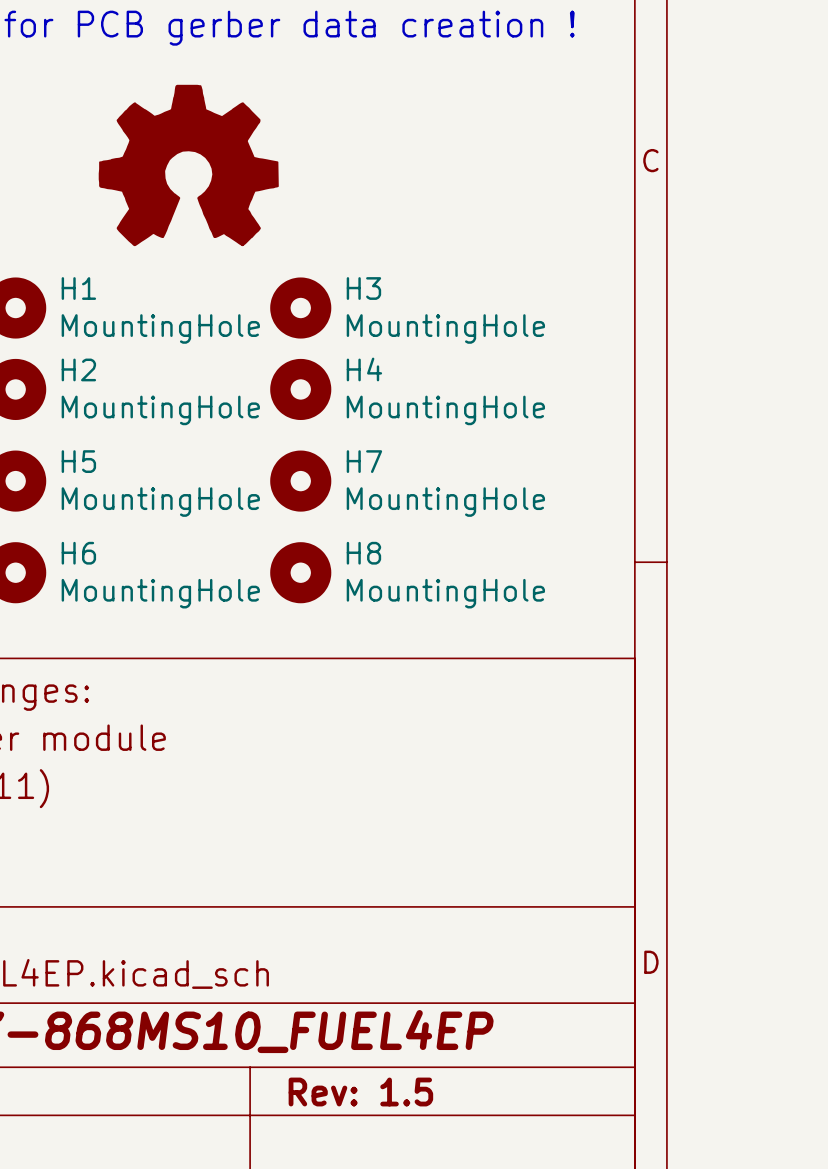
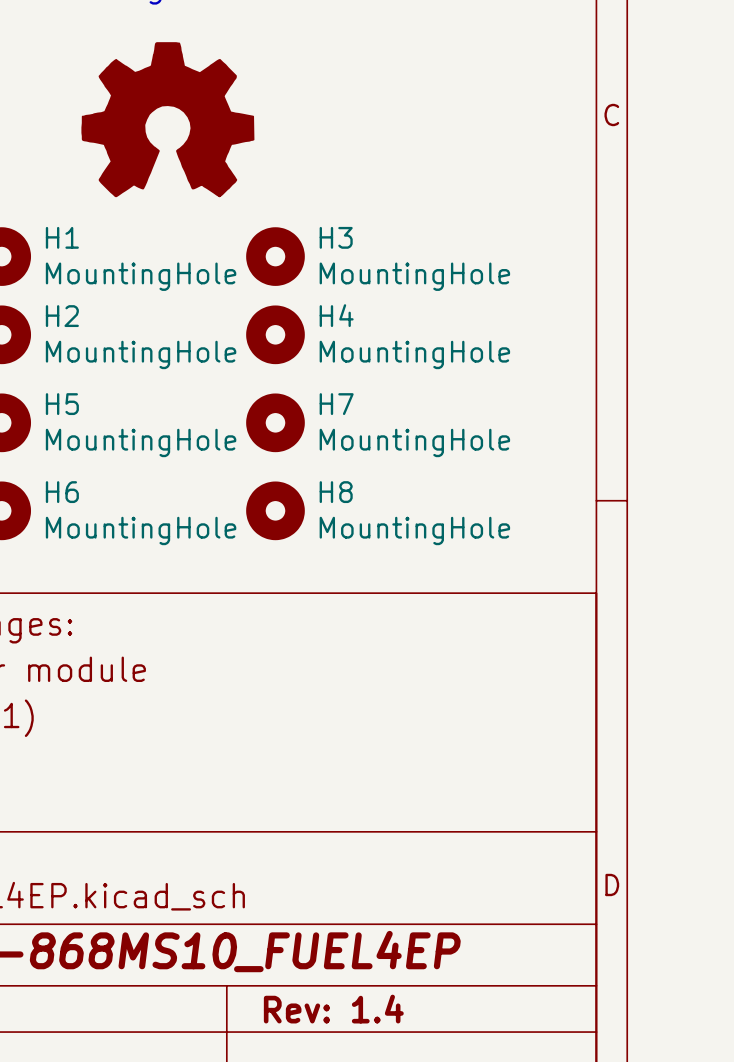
title block: Rev: 1.5 (360, 1092) -> Rev: 1.4 (333, 1009)

